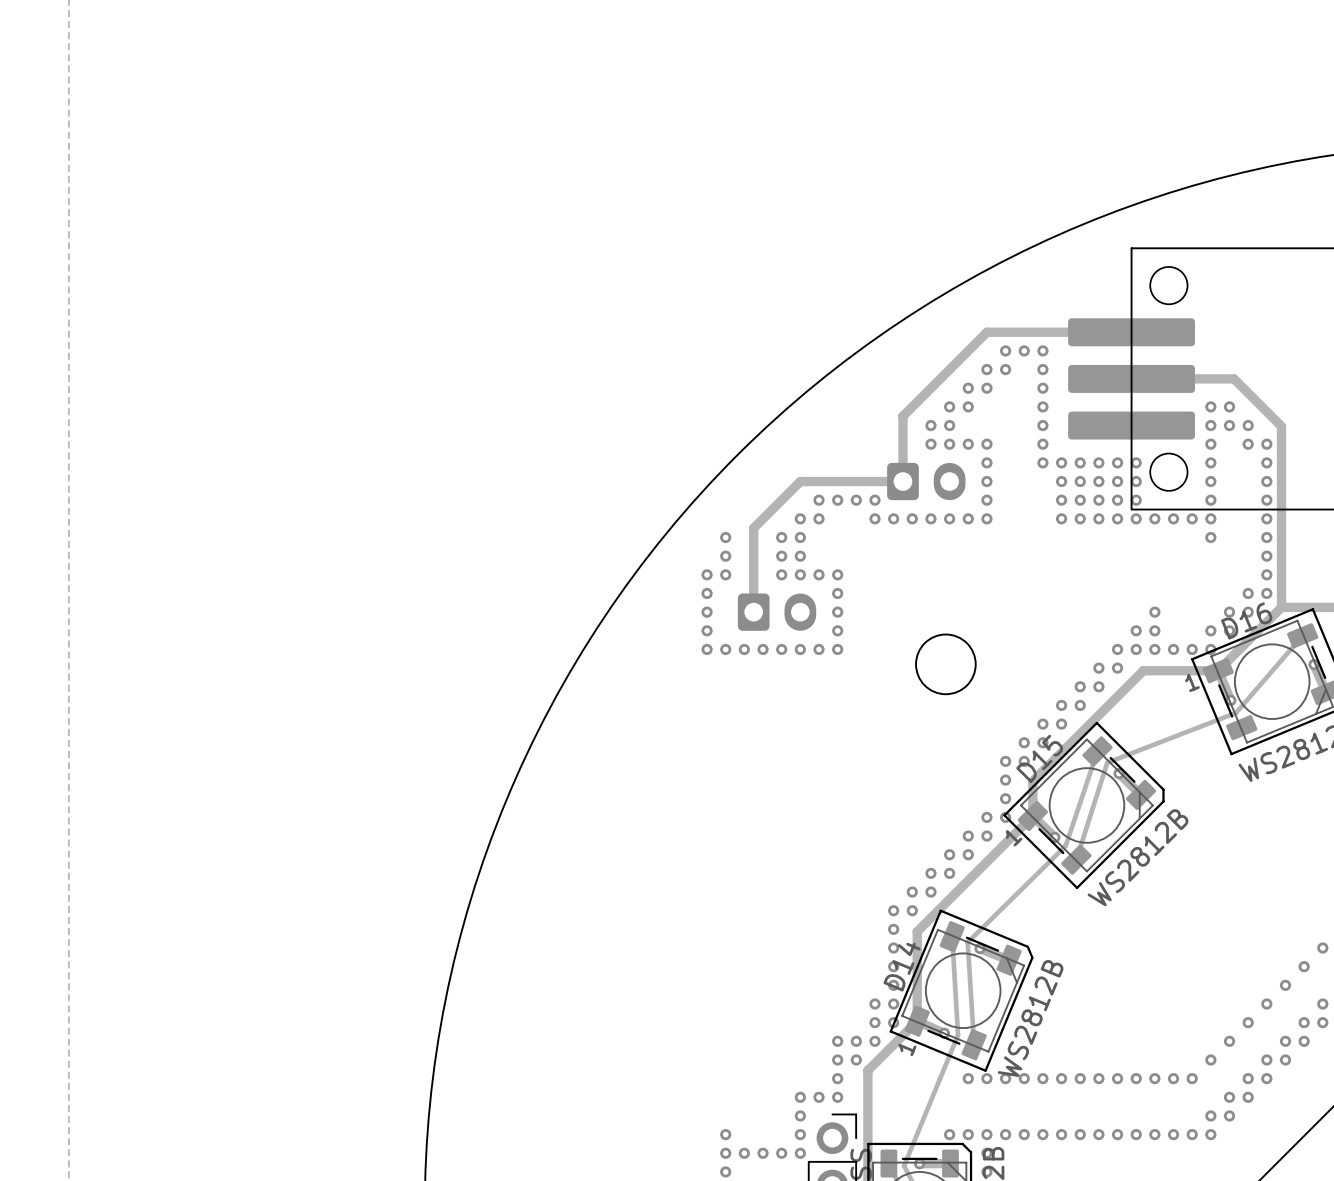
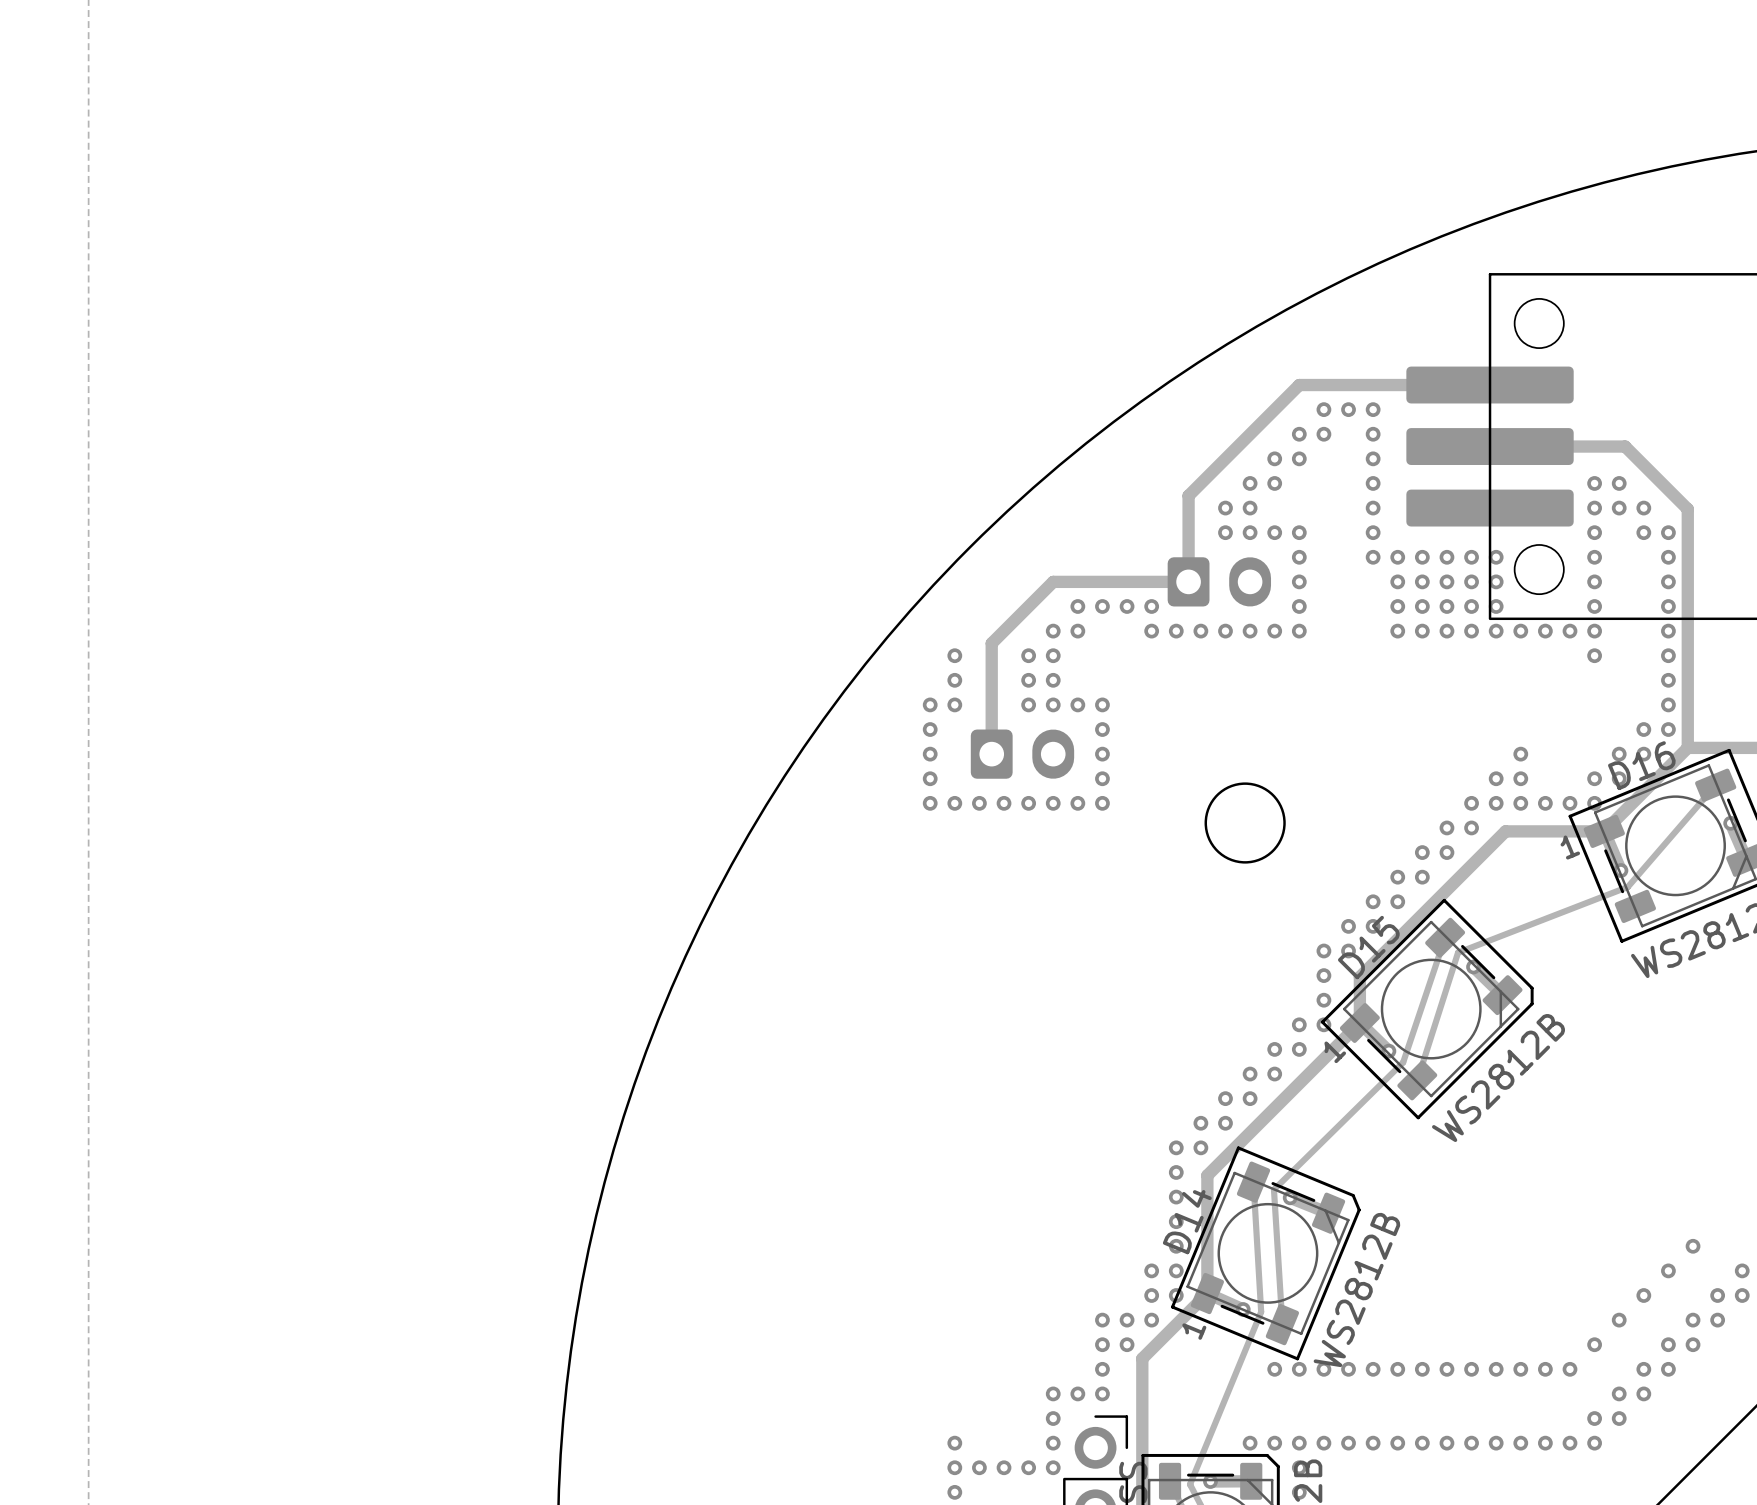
via: (1322, 948) -> none
via: (1304, 966) -> none

